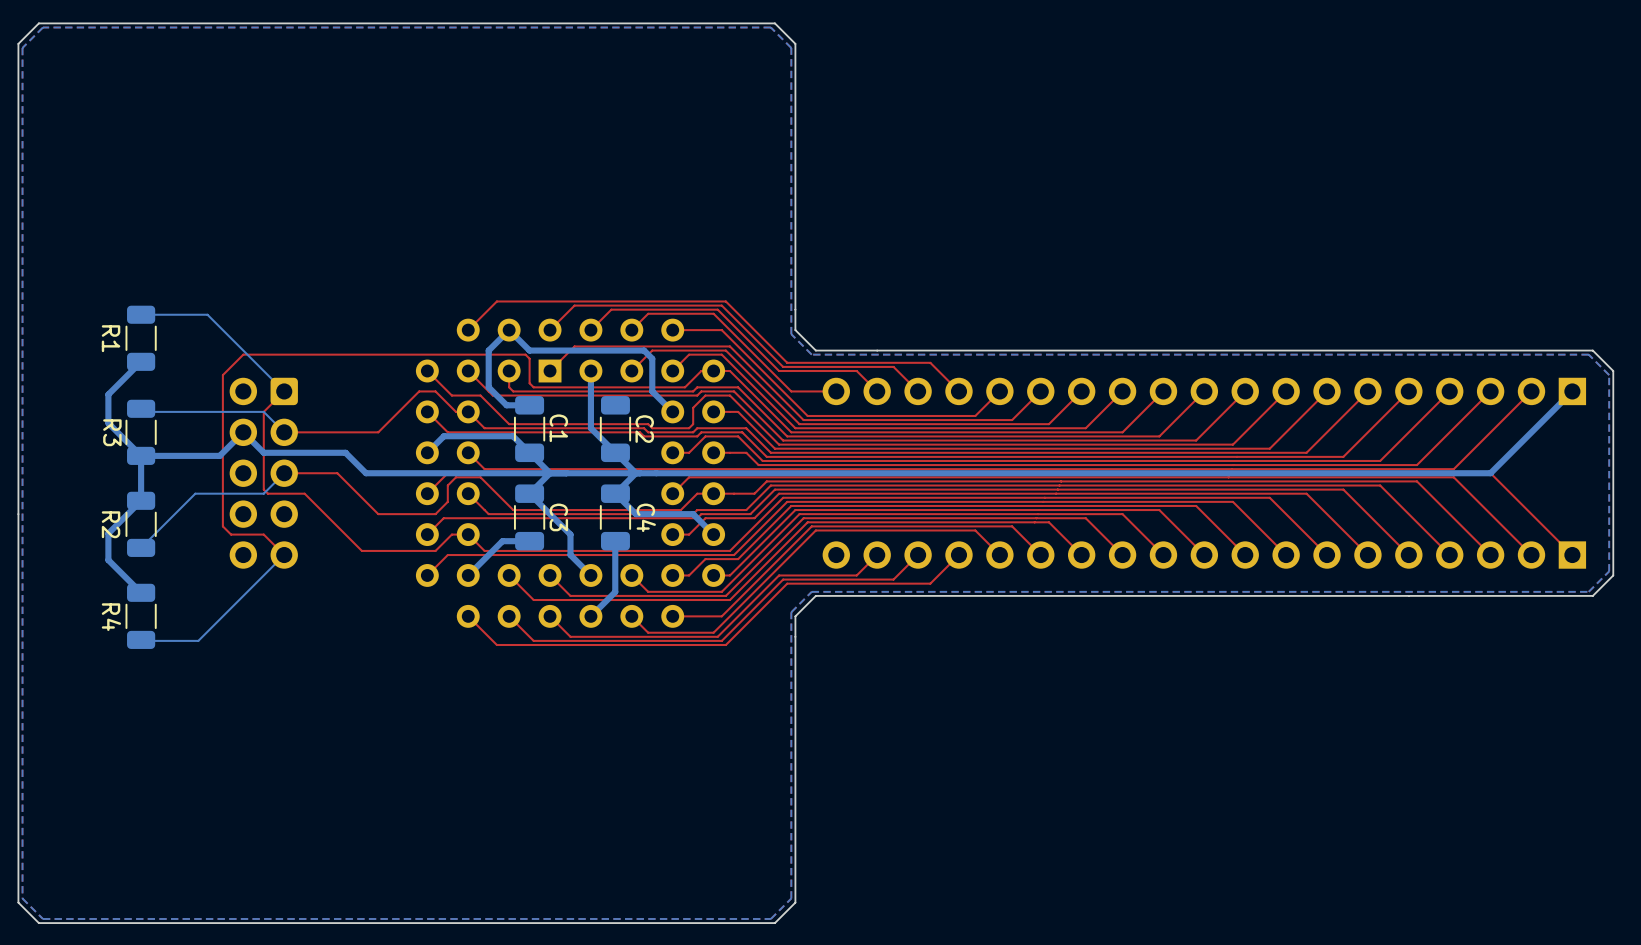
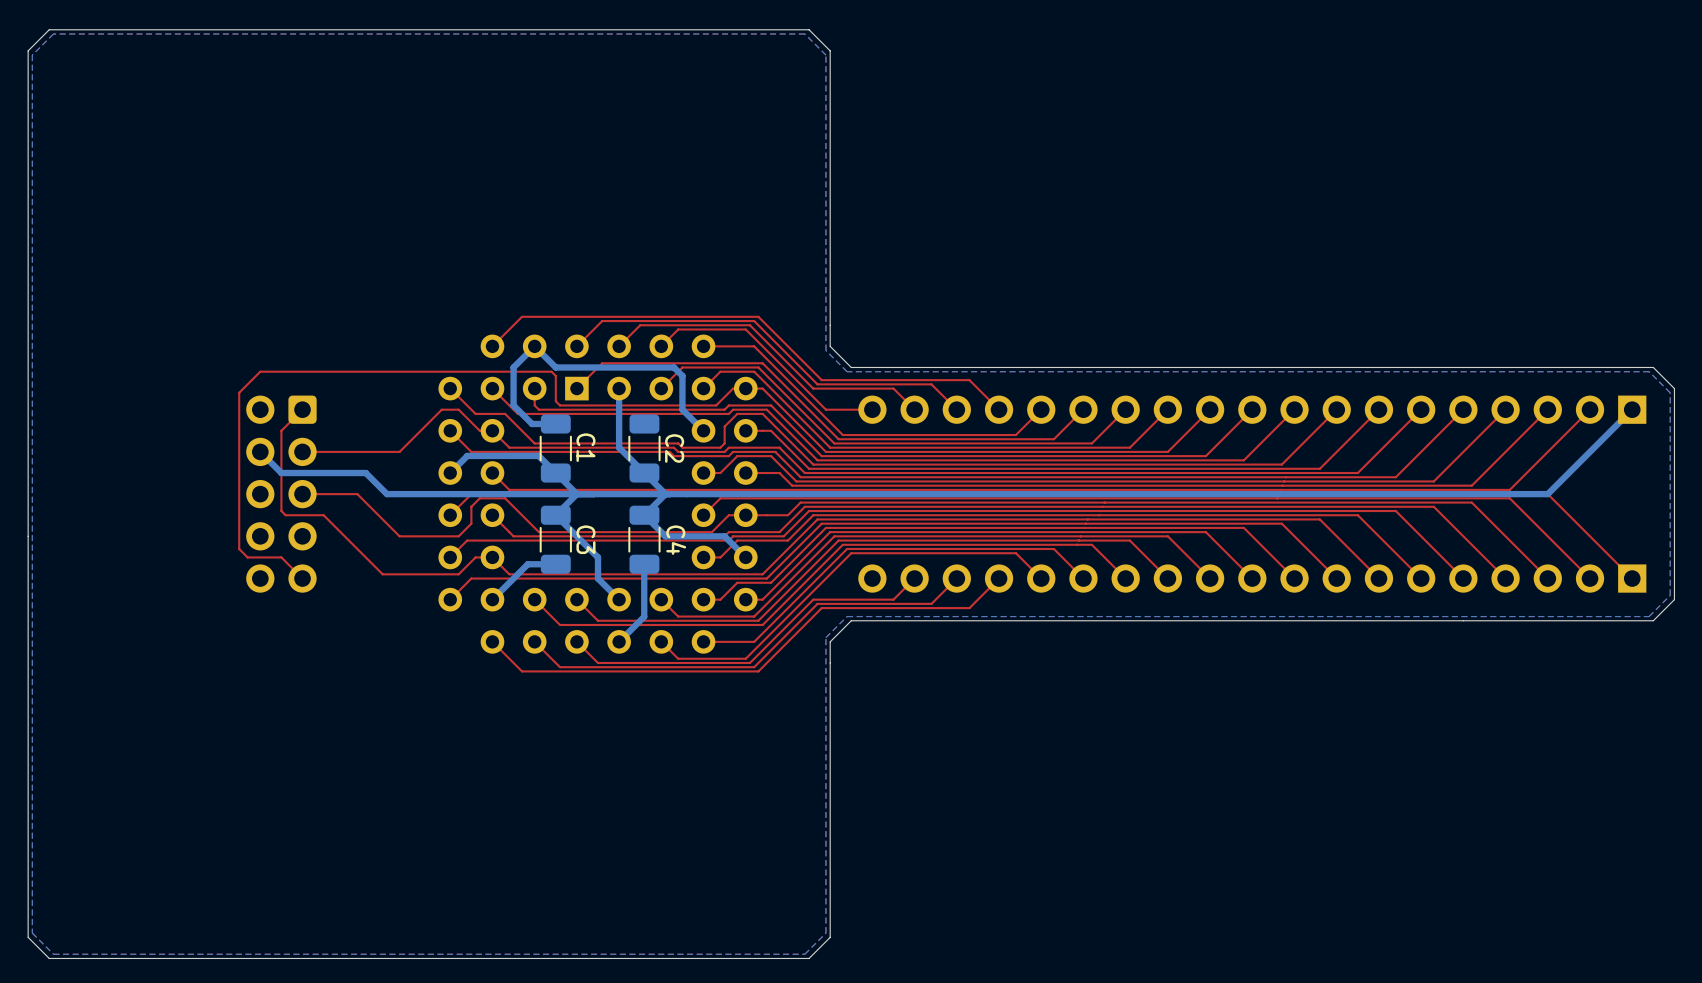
bottom track: (141, 314) (207, 314) (284, 391) -> none
R1: (141, 338) -> none
bottom track: (141, 361) (108, 394) (108, 423) (141, 455) -> none
bottom track: (141, 408) (144, 411) (263, 411) (284, 432) -> none
R3: (141, 432) -> none
bottom track: (243, 432) (219, 455) (141, 455) -> none
bottom track: (141, 455) (141, 500) (108, 533) (108, 560) (141, 592) -> none
bottom track: (284, 473) (263, 493) (195, 493) (141, 547) -> none
R2: (141, 524) -> none
bottom track: (284, 555) (198, 640) (141, 639) -> none
R4: (141, 616) -> none

